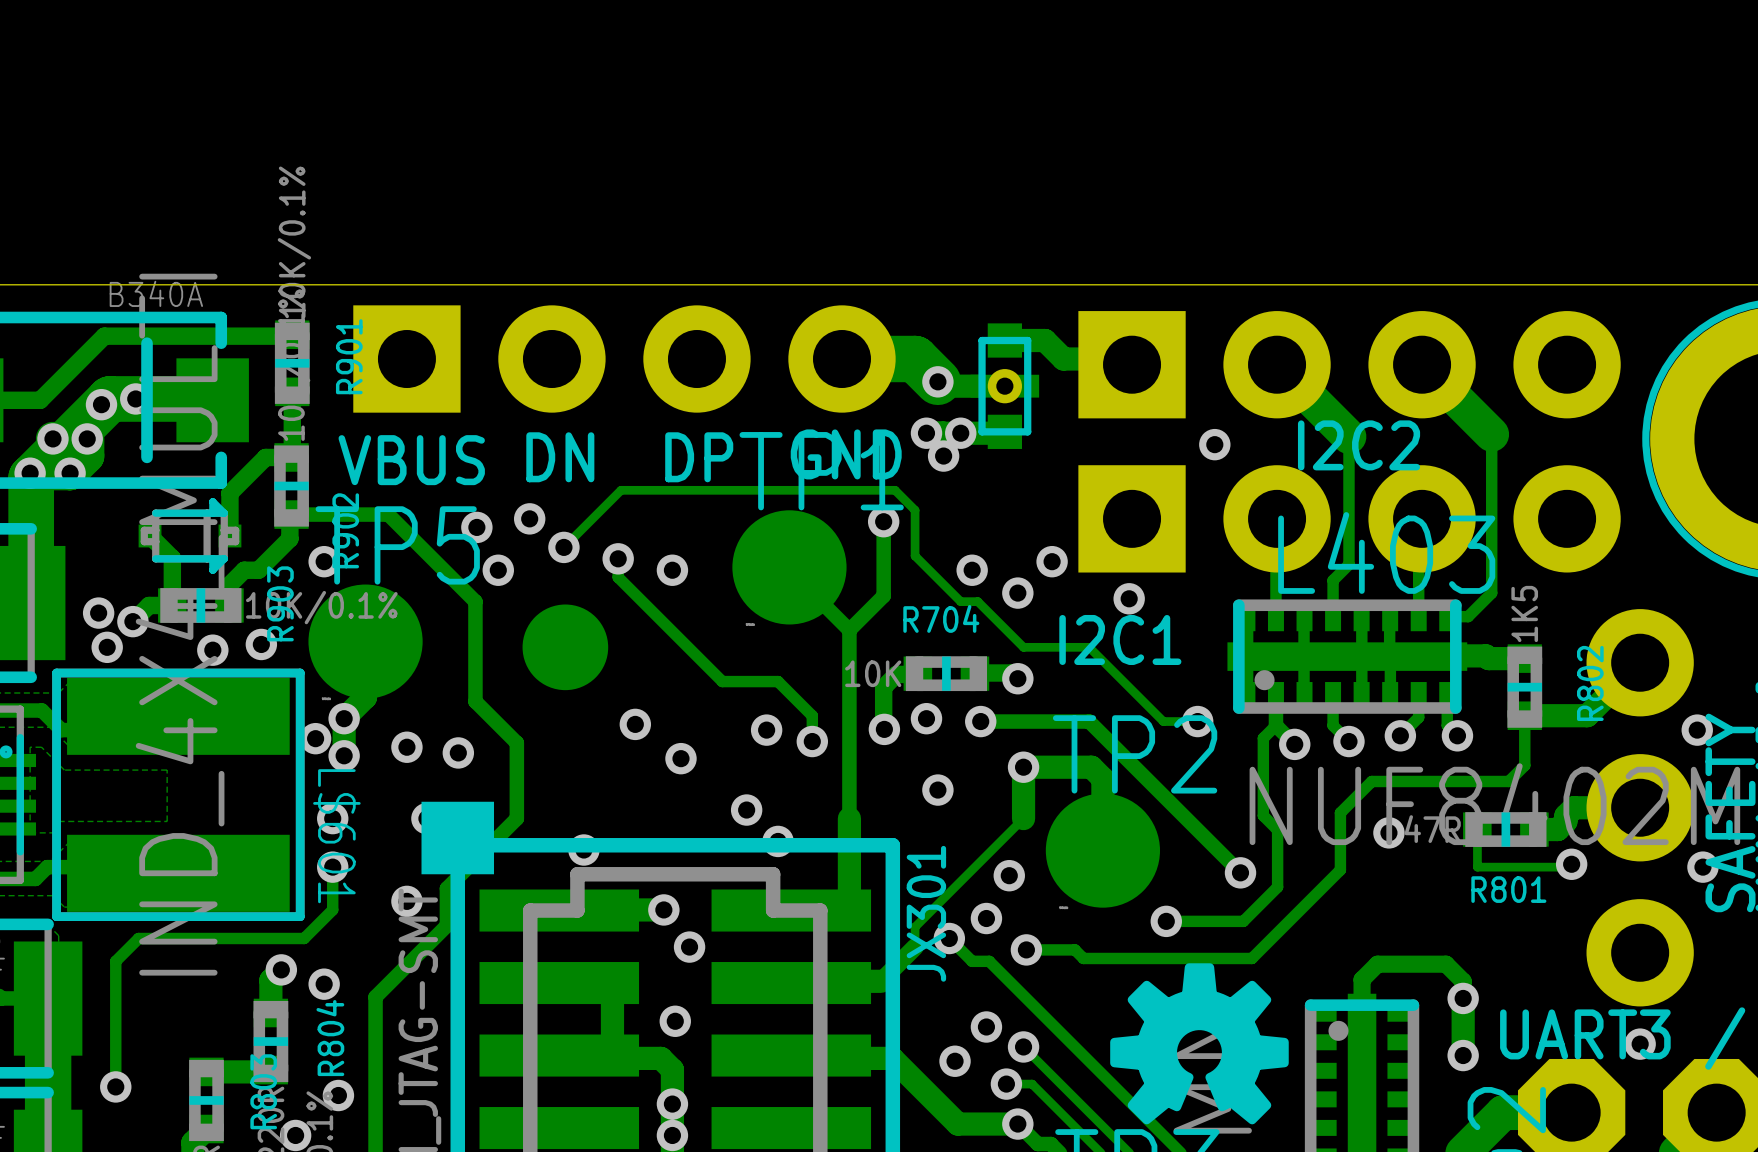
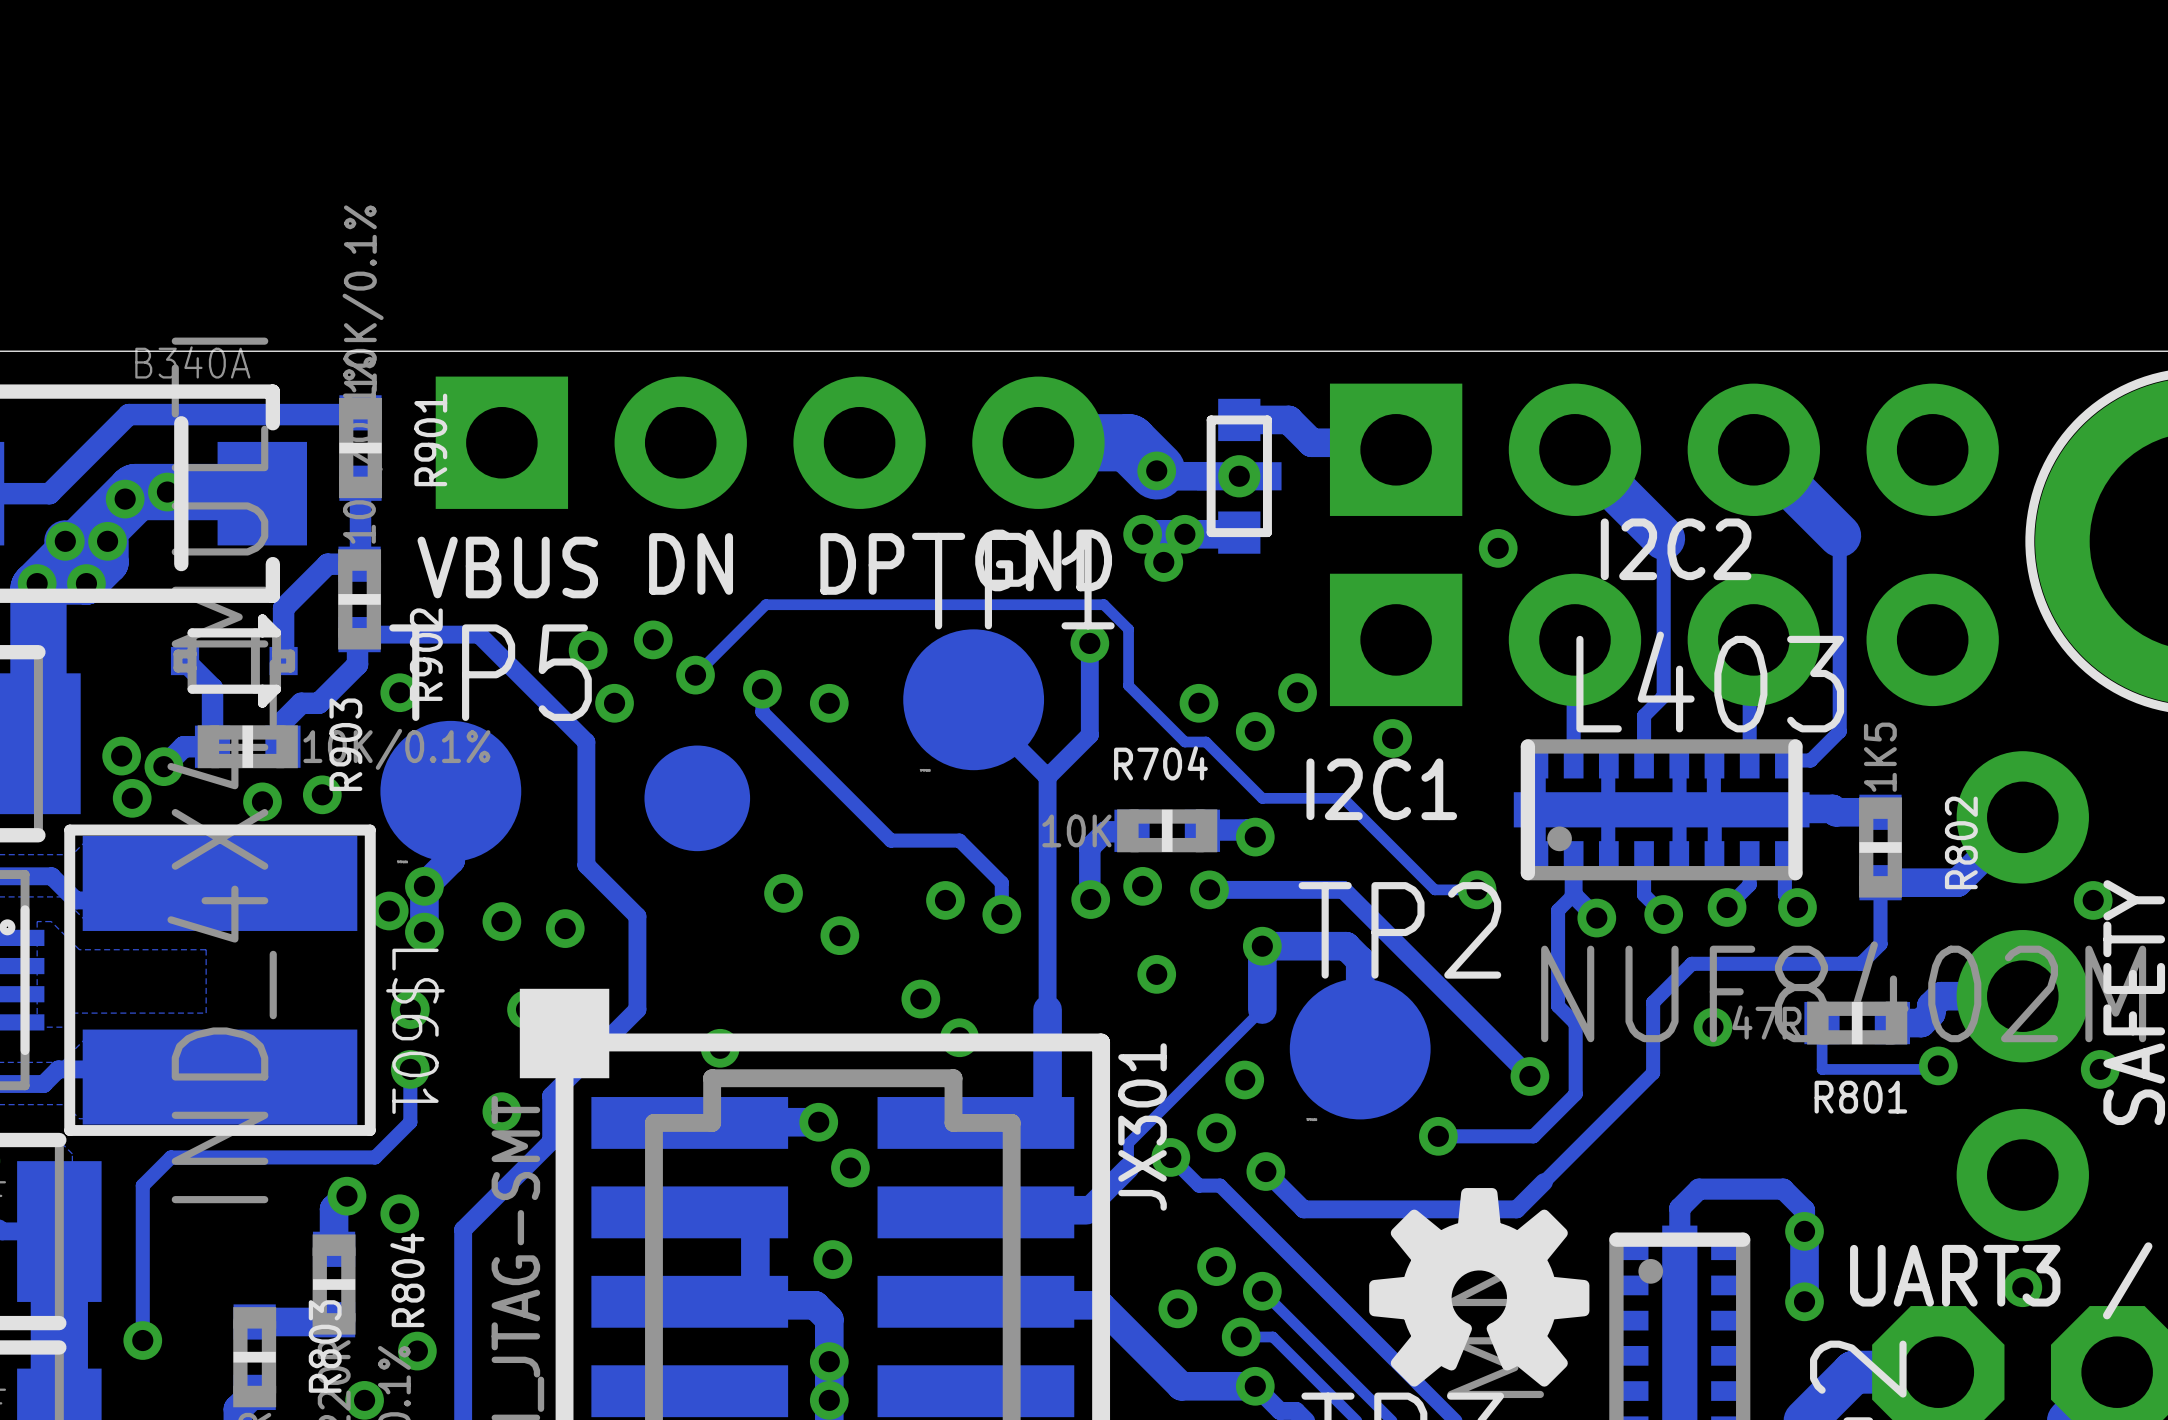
track: (1026, 949) (1074, 949) (1083, 958) (1251, 958) -> (1265, 1171) (1303, 1209) (1516, 1209) (1543, 1182)

